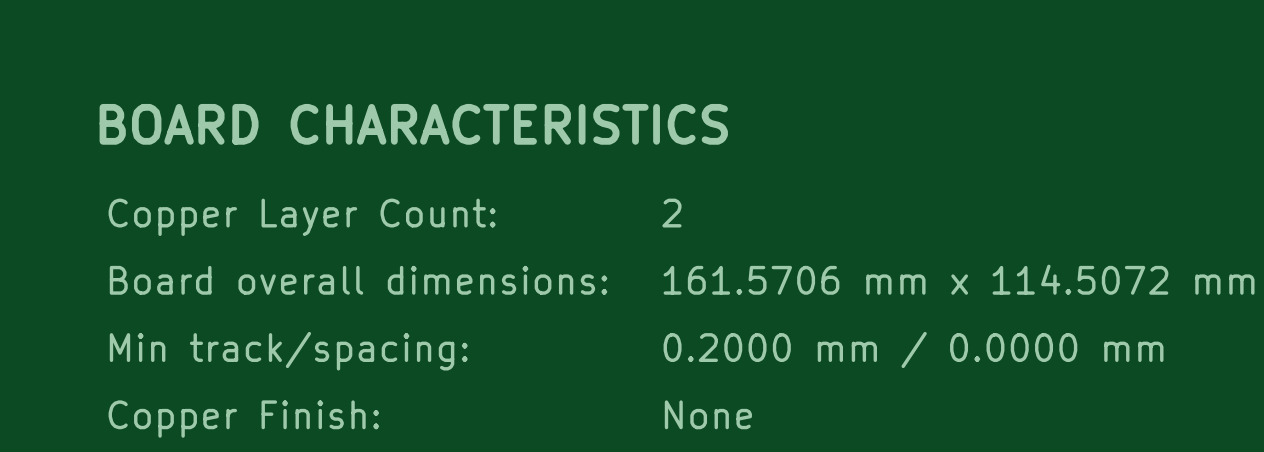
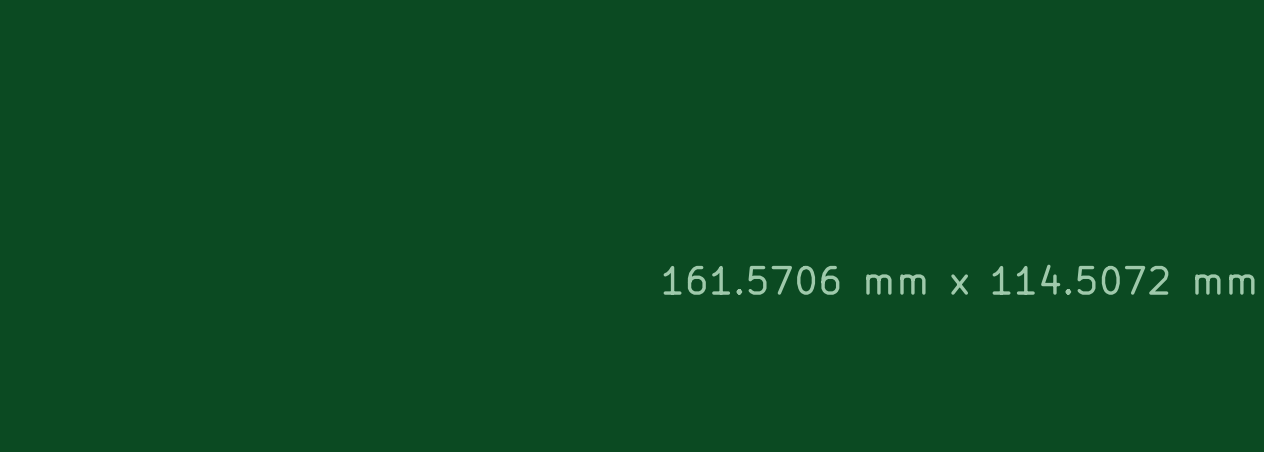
text: BOARD CHARACTERISTICS (413, 124) -> none
text: 2 (671, 213) -> none
text: Copper Layer Count: (302, 217) -> none
text: Board overall dimensions: (358, 280) -> none
text: 0.2000 mm / 0.0000 mm (913, 349) -> none
text: Min track/spacing: (288, 351) -> none
text: None (708, 414) -> none
text: Copper Finish: (243, 419) -> none

